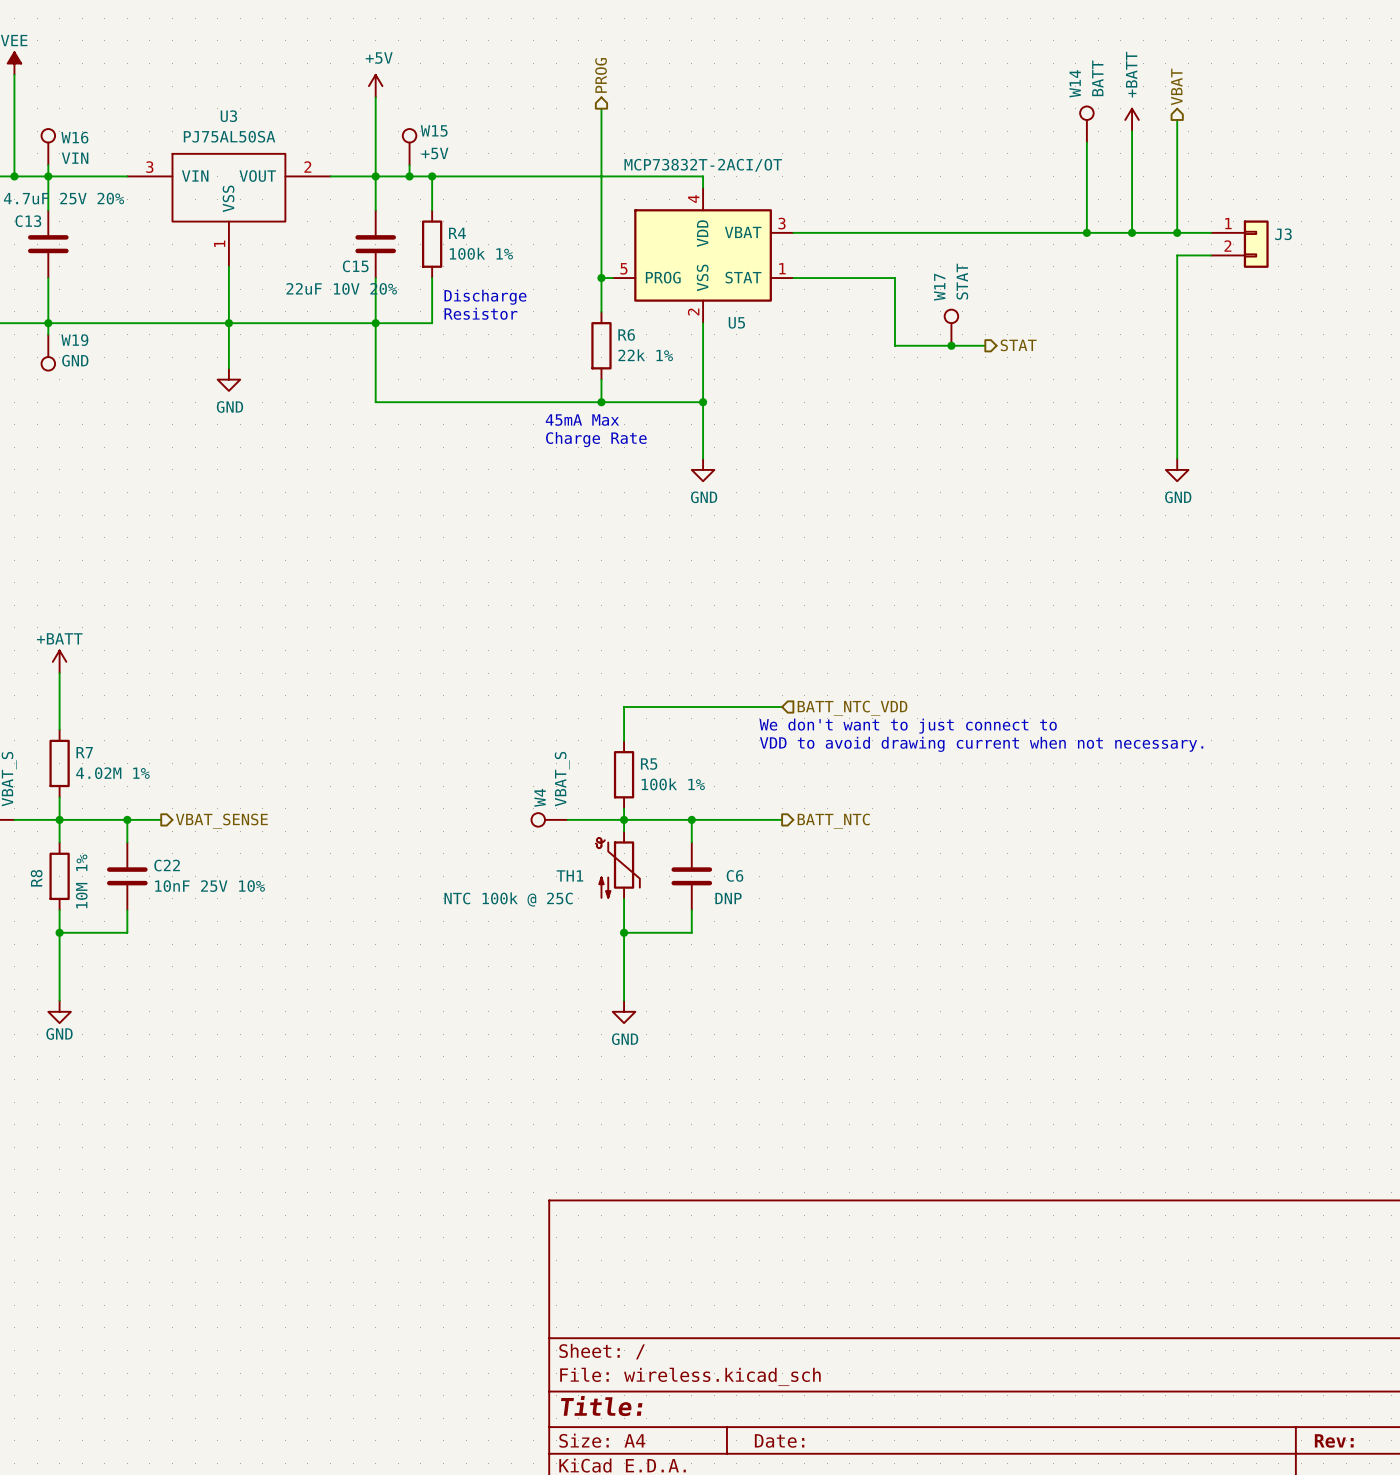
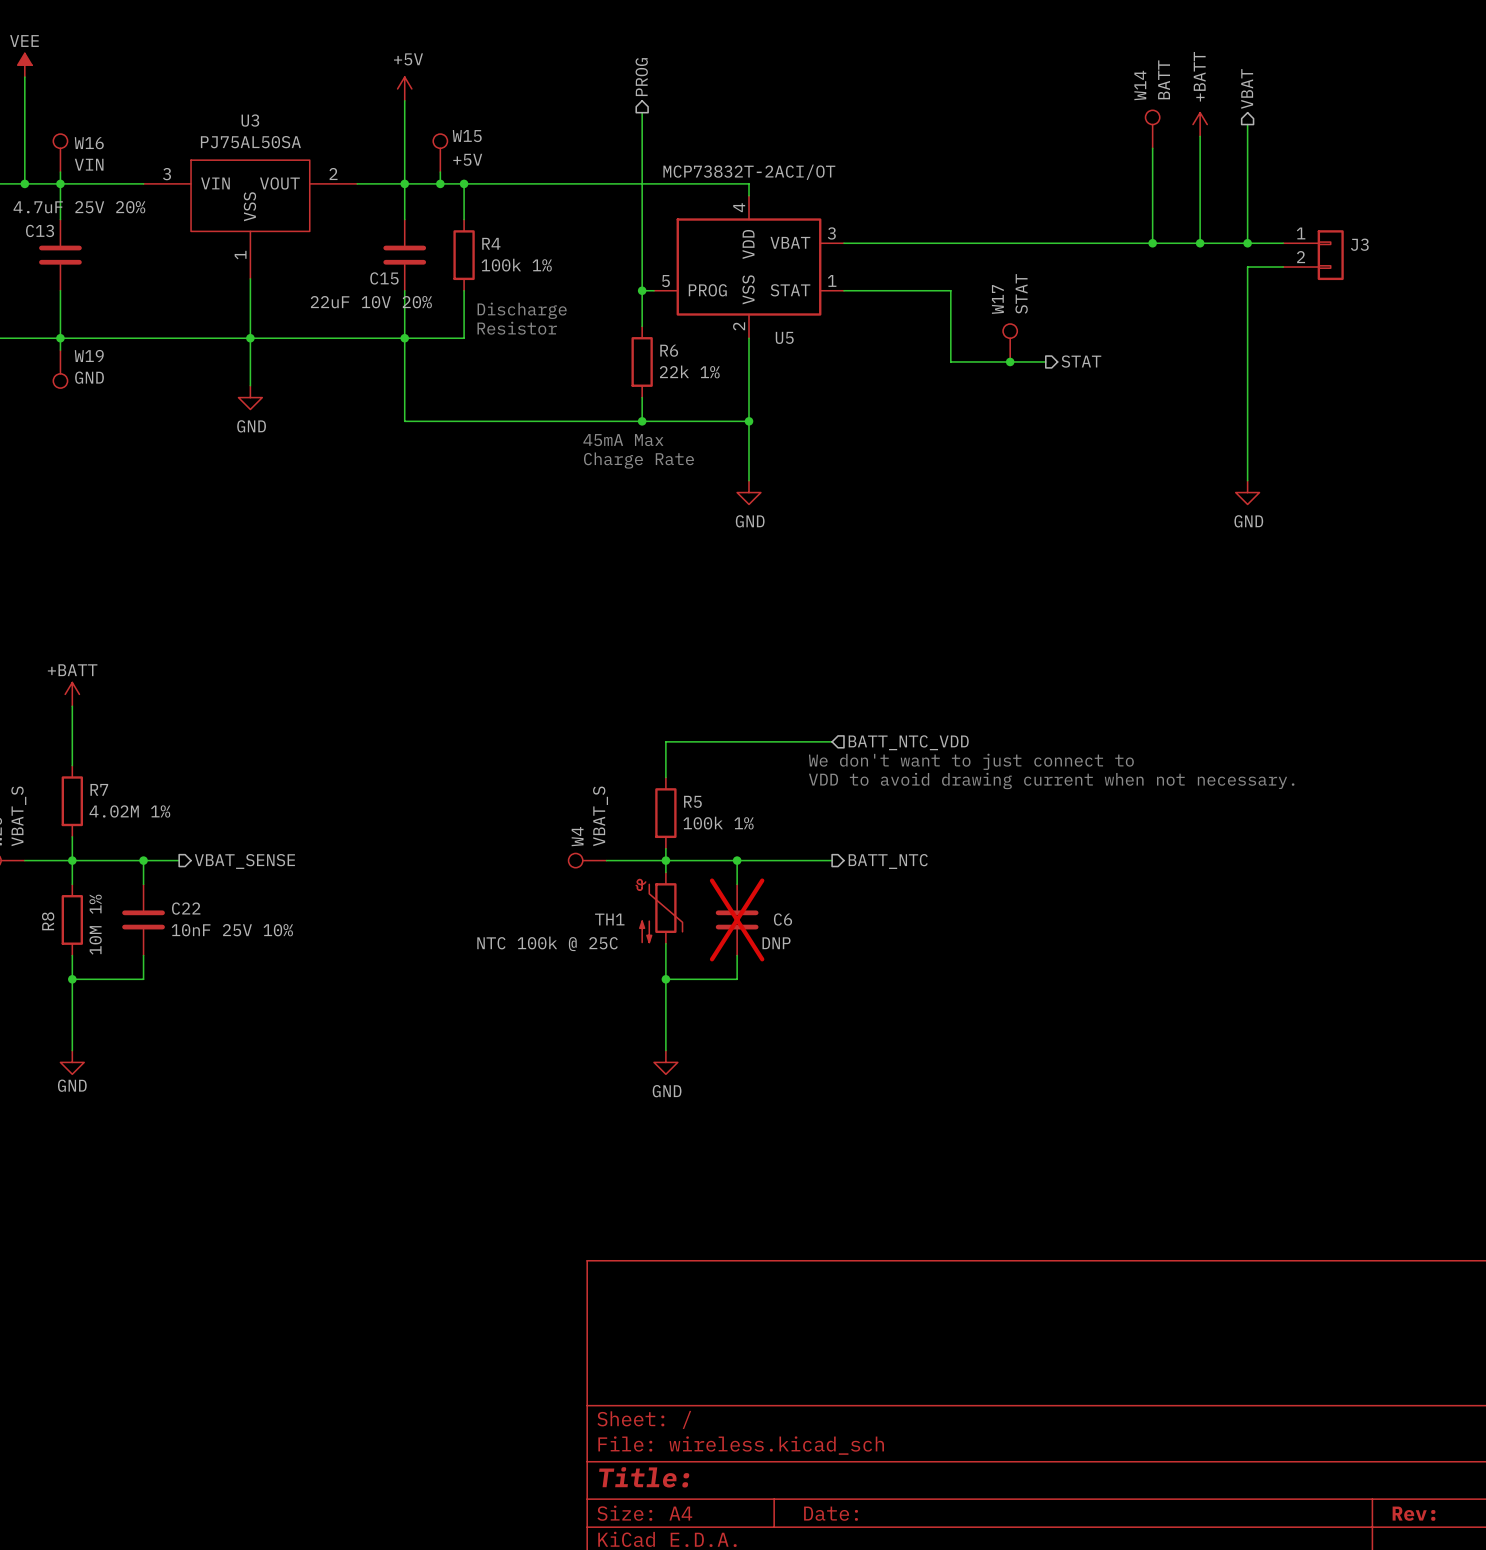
C6 do-not-place cross: none -> (737, 919)

